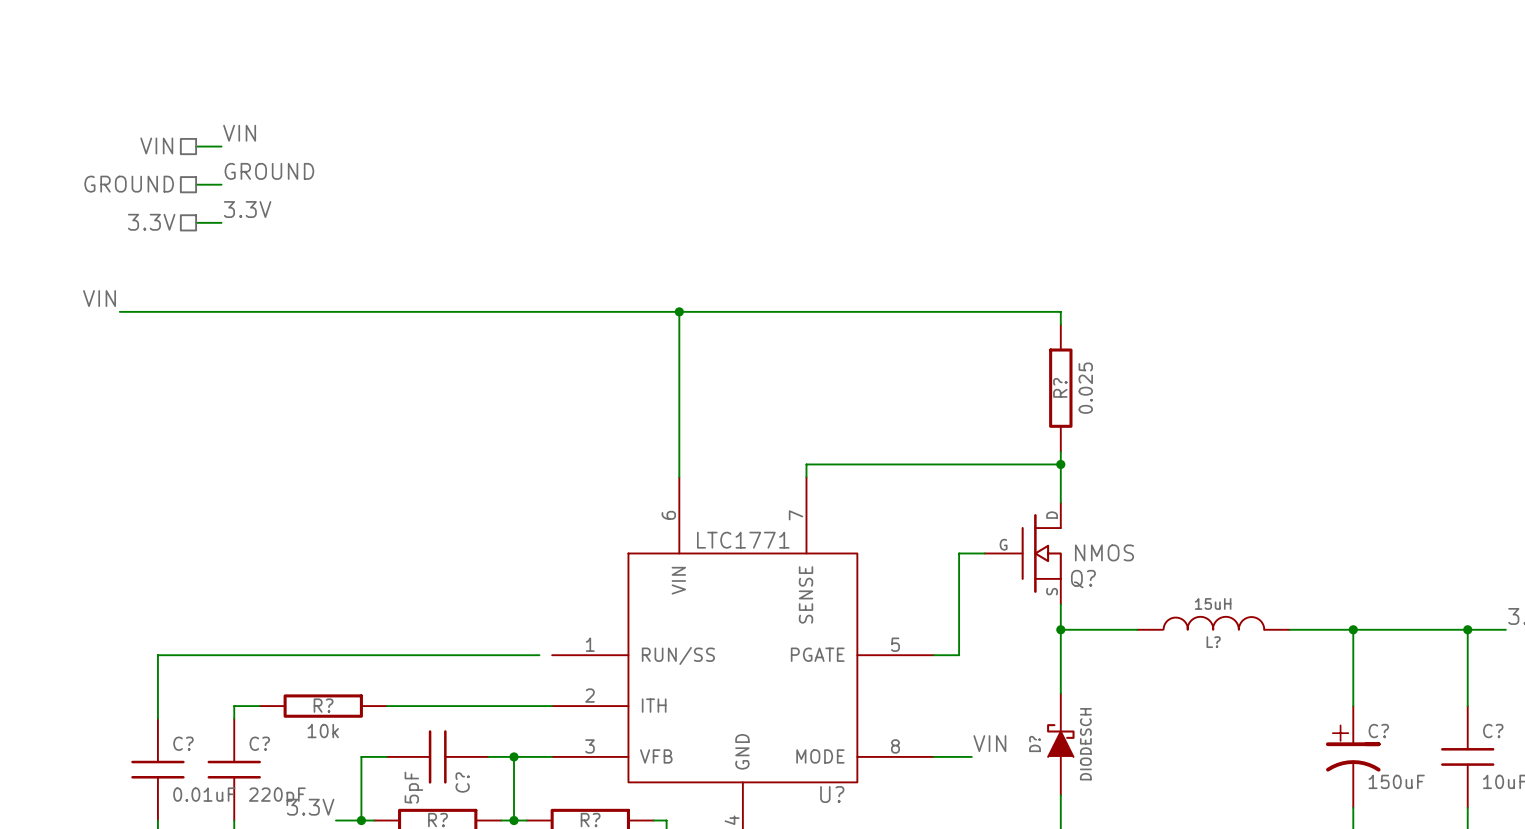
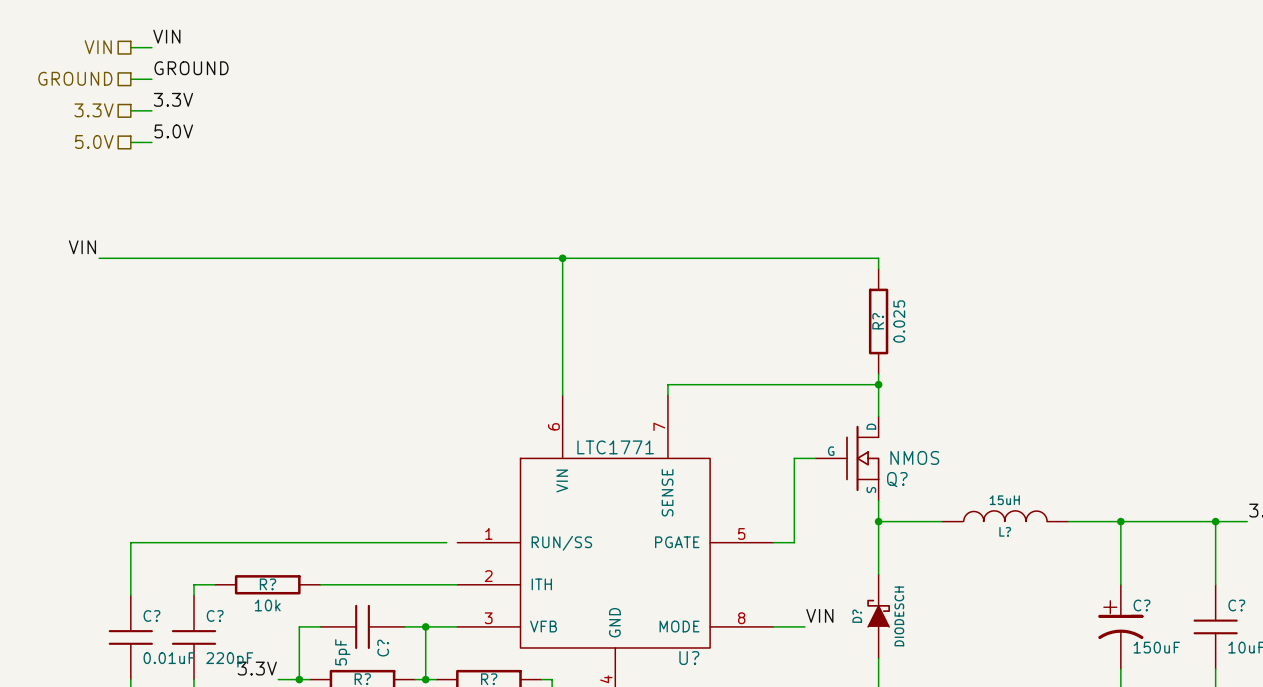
wire: none -> (130, 47) (151, 47)
label position: VIN (239, 133) -> VIN (166, 36)
hierarchical label position: VIN (156, 145) -> VIN (98, 47)
wire: (196, 146) (221, 146) -> (130, 110) (151, 110)
label: none -> 5.0V (173, 131)
hierarchical label: none -> 5.0V (94, 141)
label position: GROUND (269, 171) -> GROUND (191, 68)
hierarchical label position: GROUND (129, 184) -> GROUND (75, 78)
wire: (196, 184) (221, 184) -> (130, 142) (151, 142)
label position: 3.3V (247, 209) -> 3.3V (173, 99)
hierarchical label position: 3.3V (151, 222) -> 3.3V (94, 110)
wire: (196, 222) (221, 222) -> (130, 79) (151, 79)

